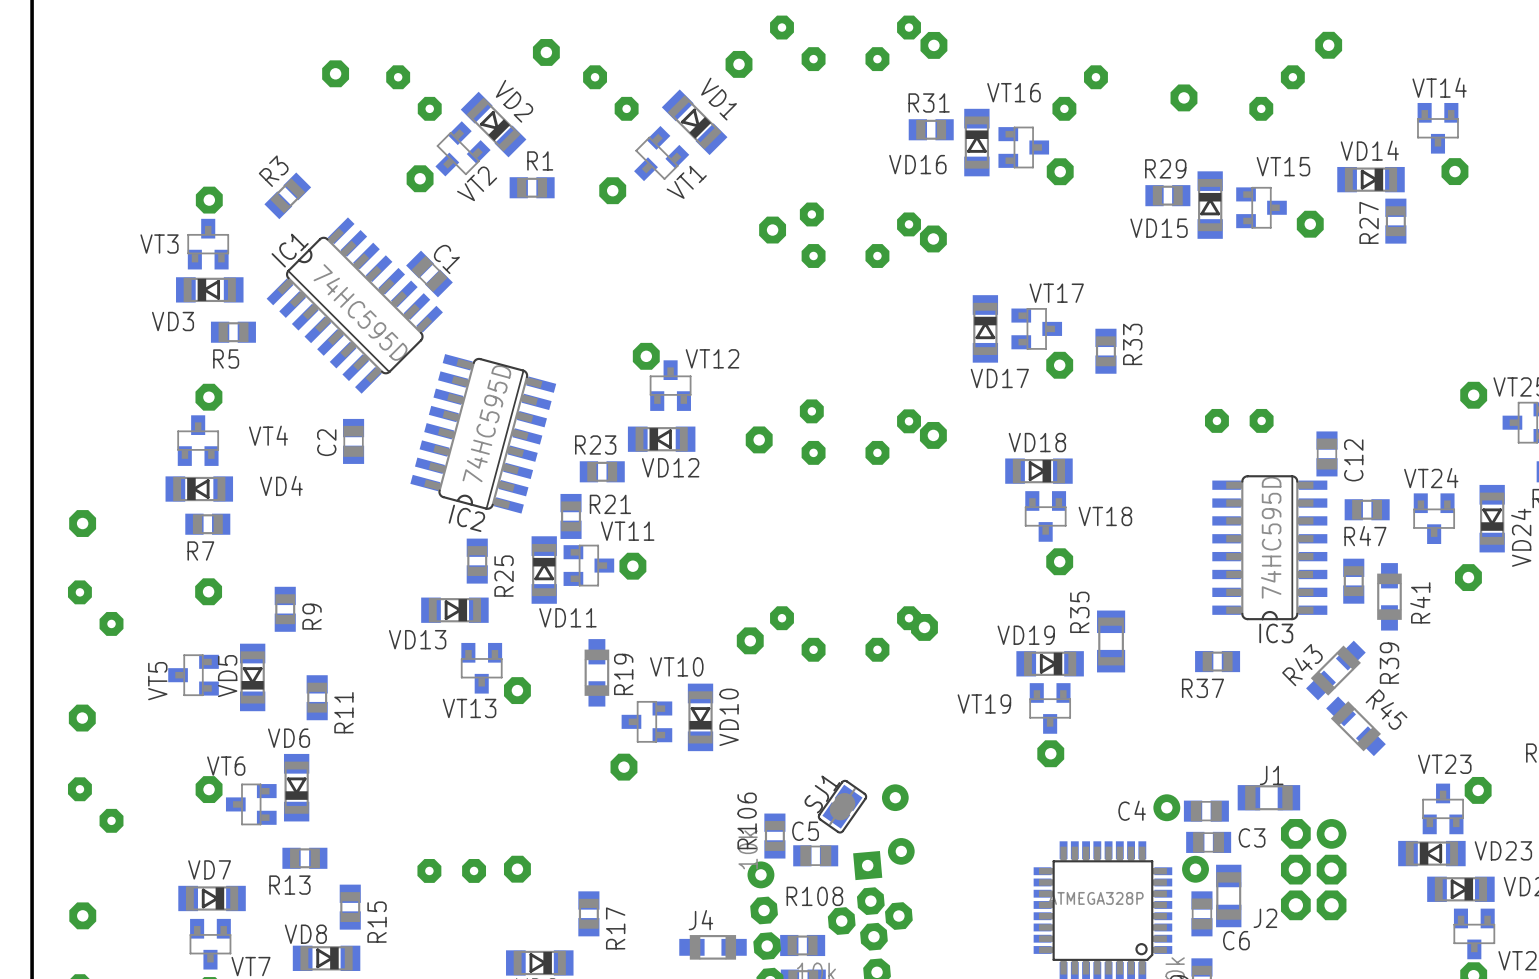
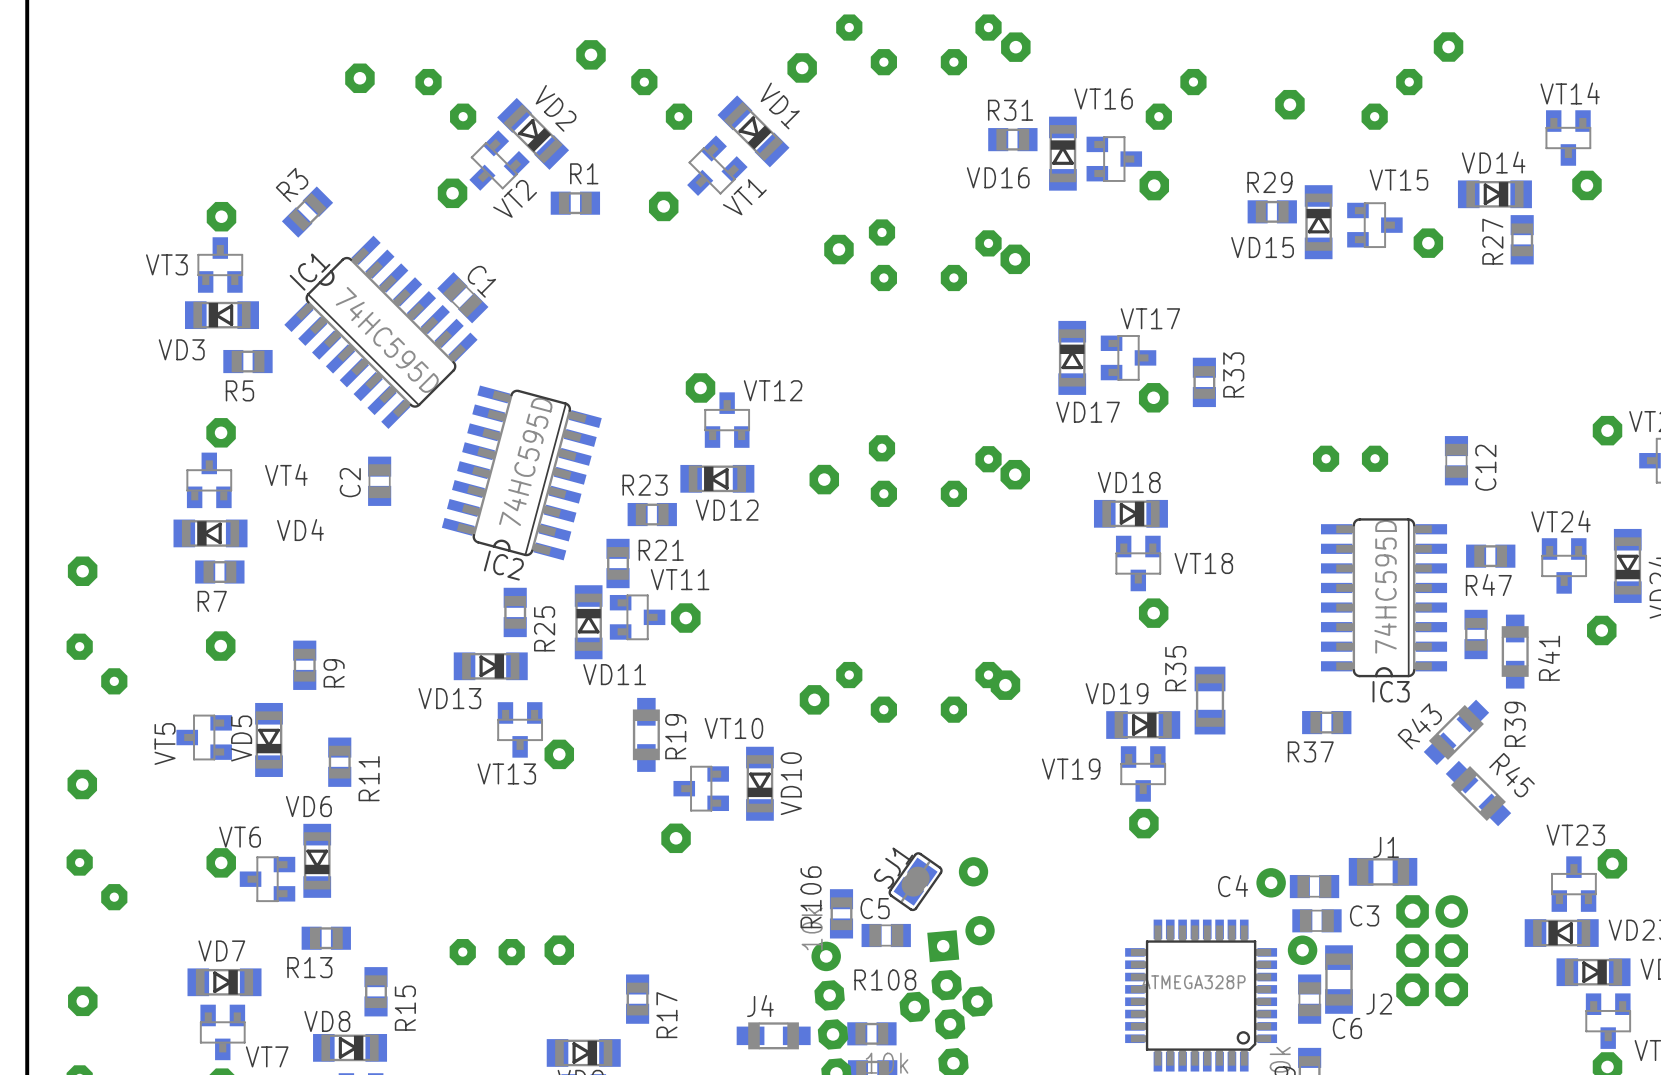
C12 position: (1326, 453) -> (1456, 460)

